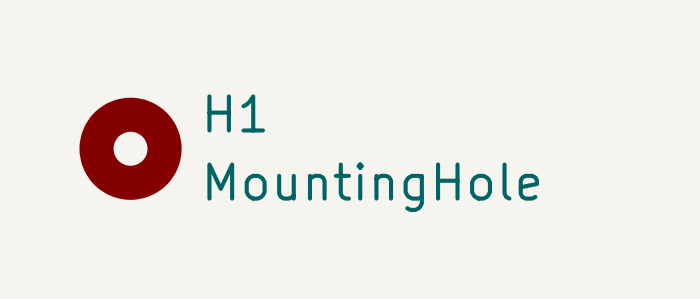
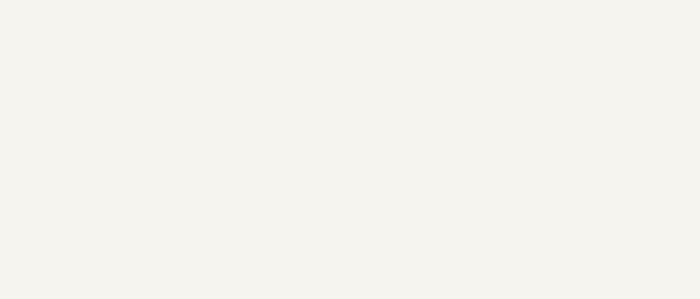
H1: MountingHole (130, 148) -> none

